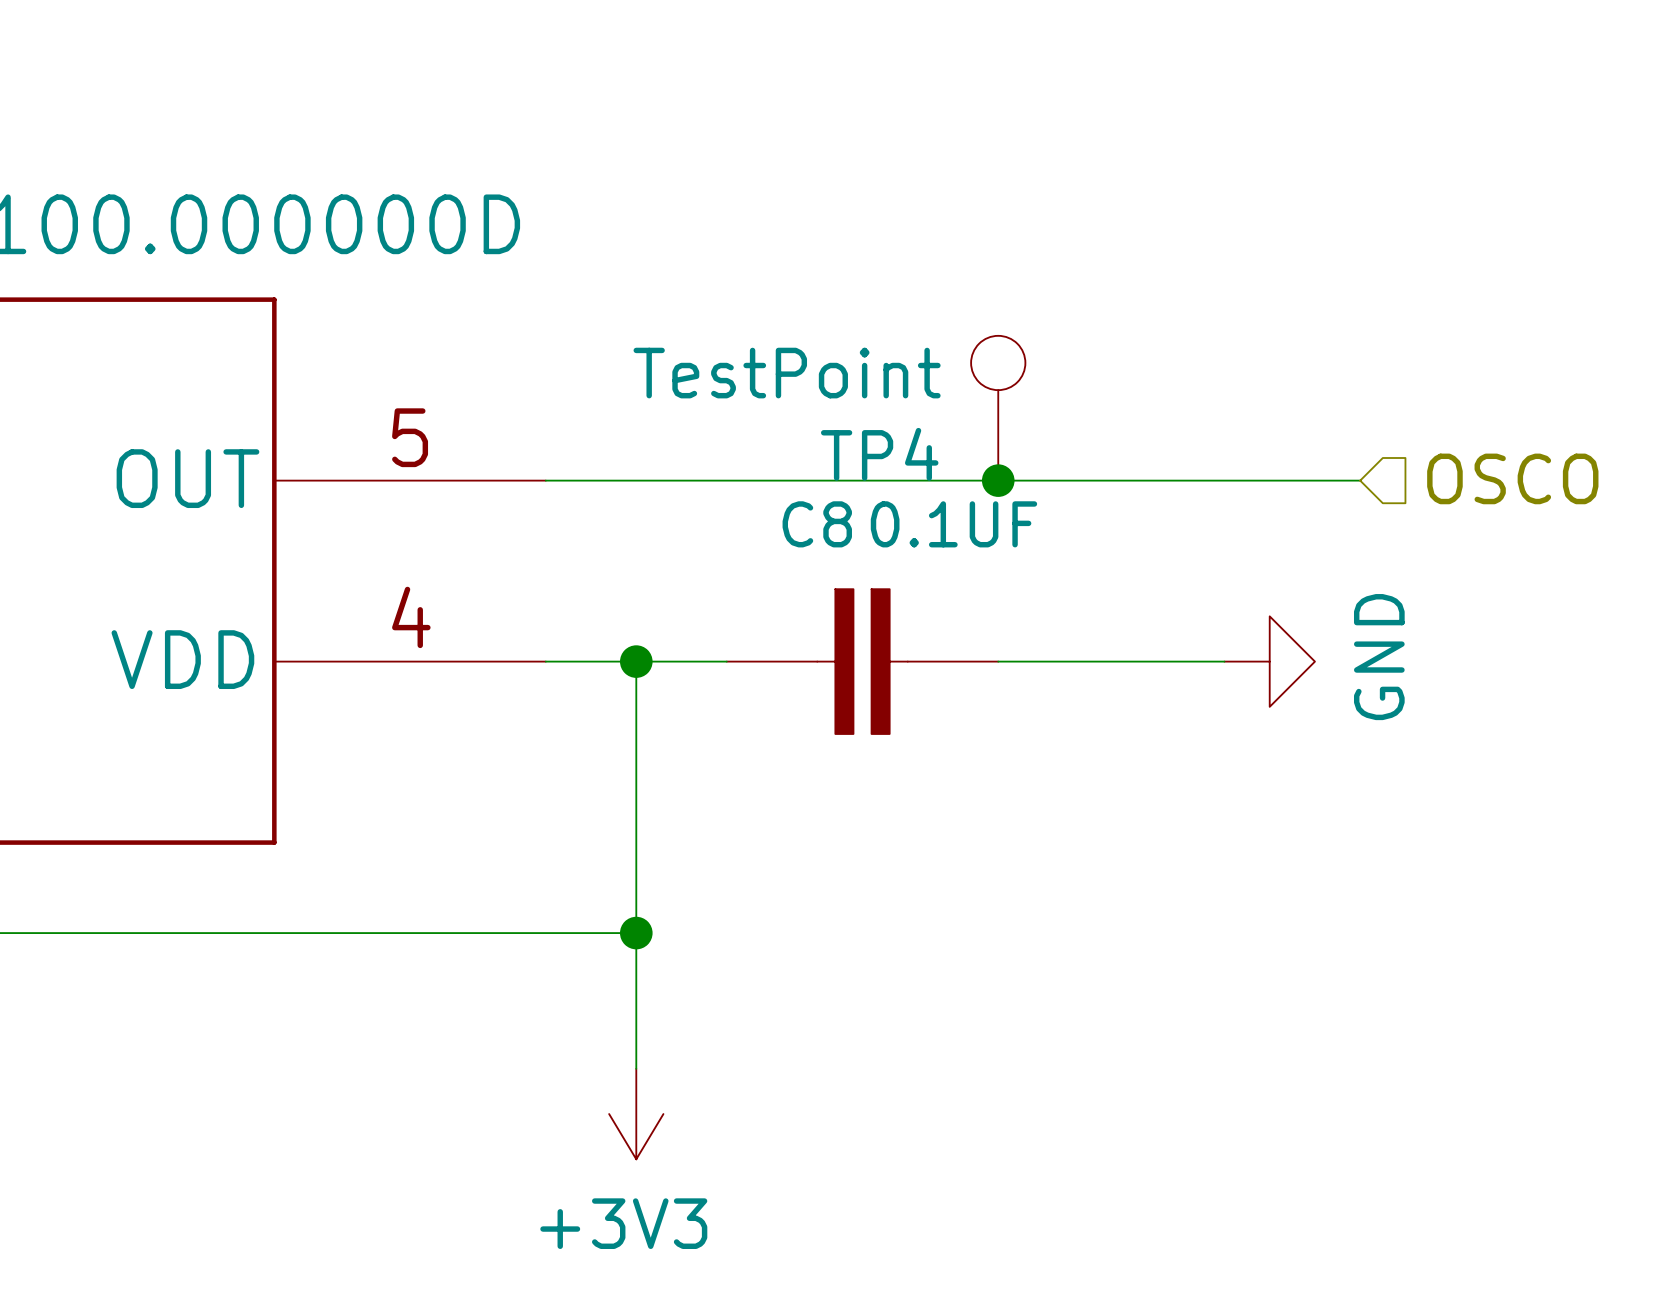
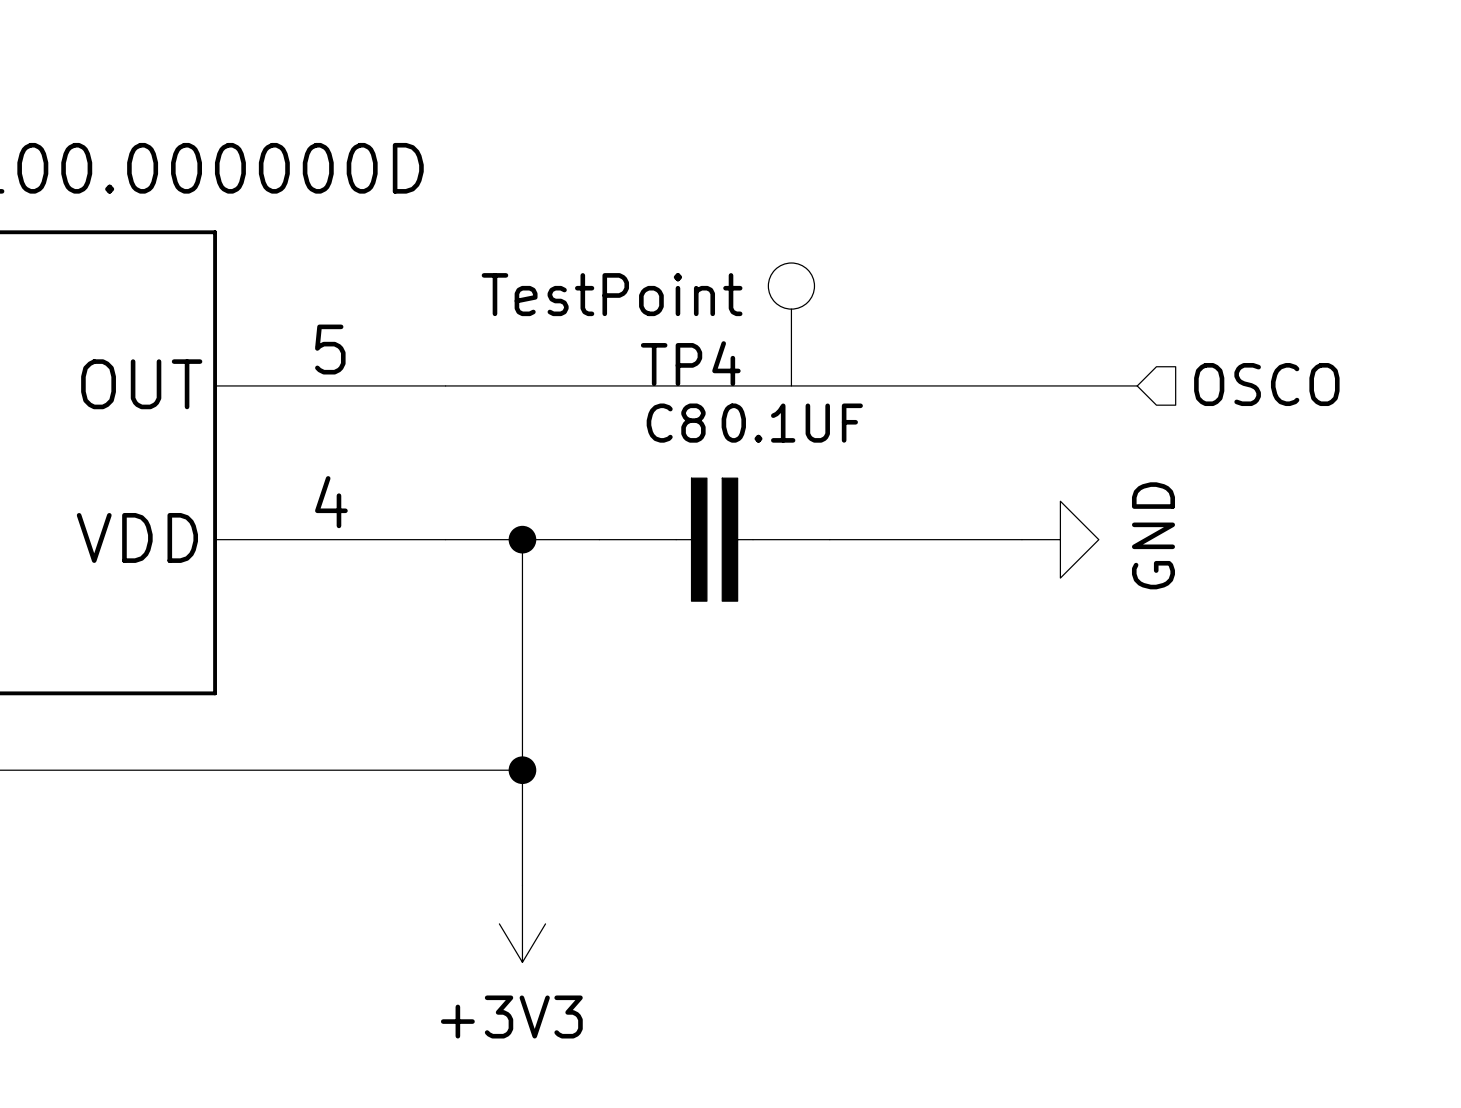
TP4 position: (998, 408) -> (791, 324)
junction: (998, 480) -> none

